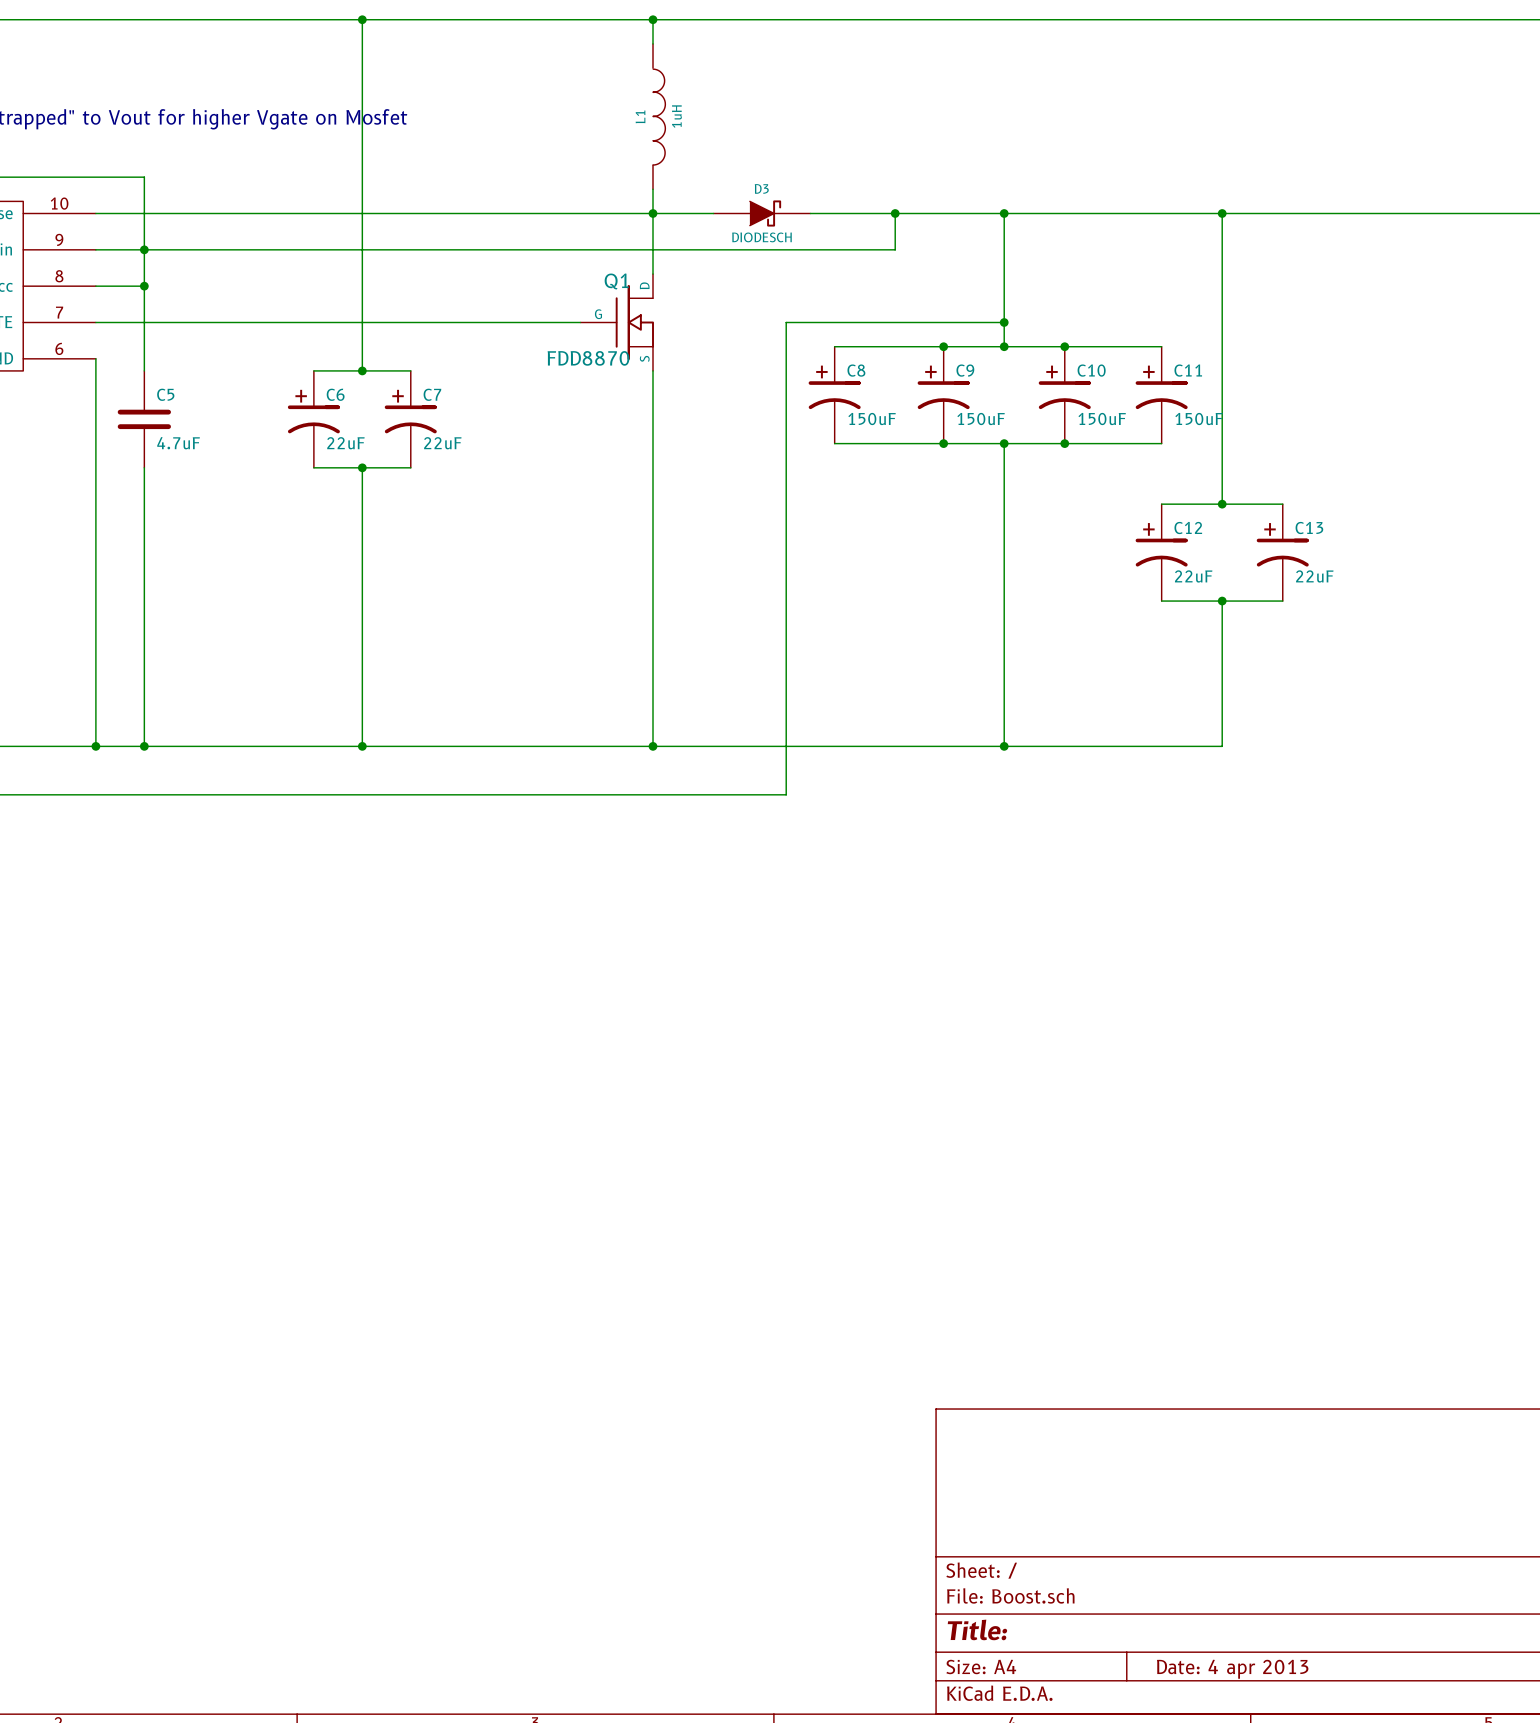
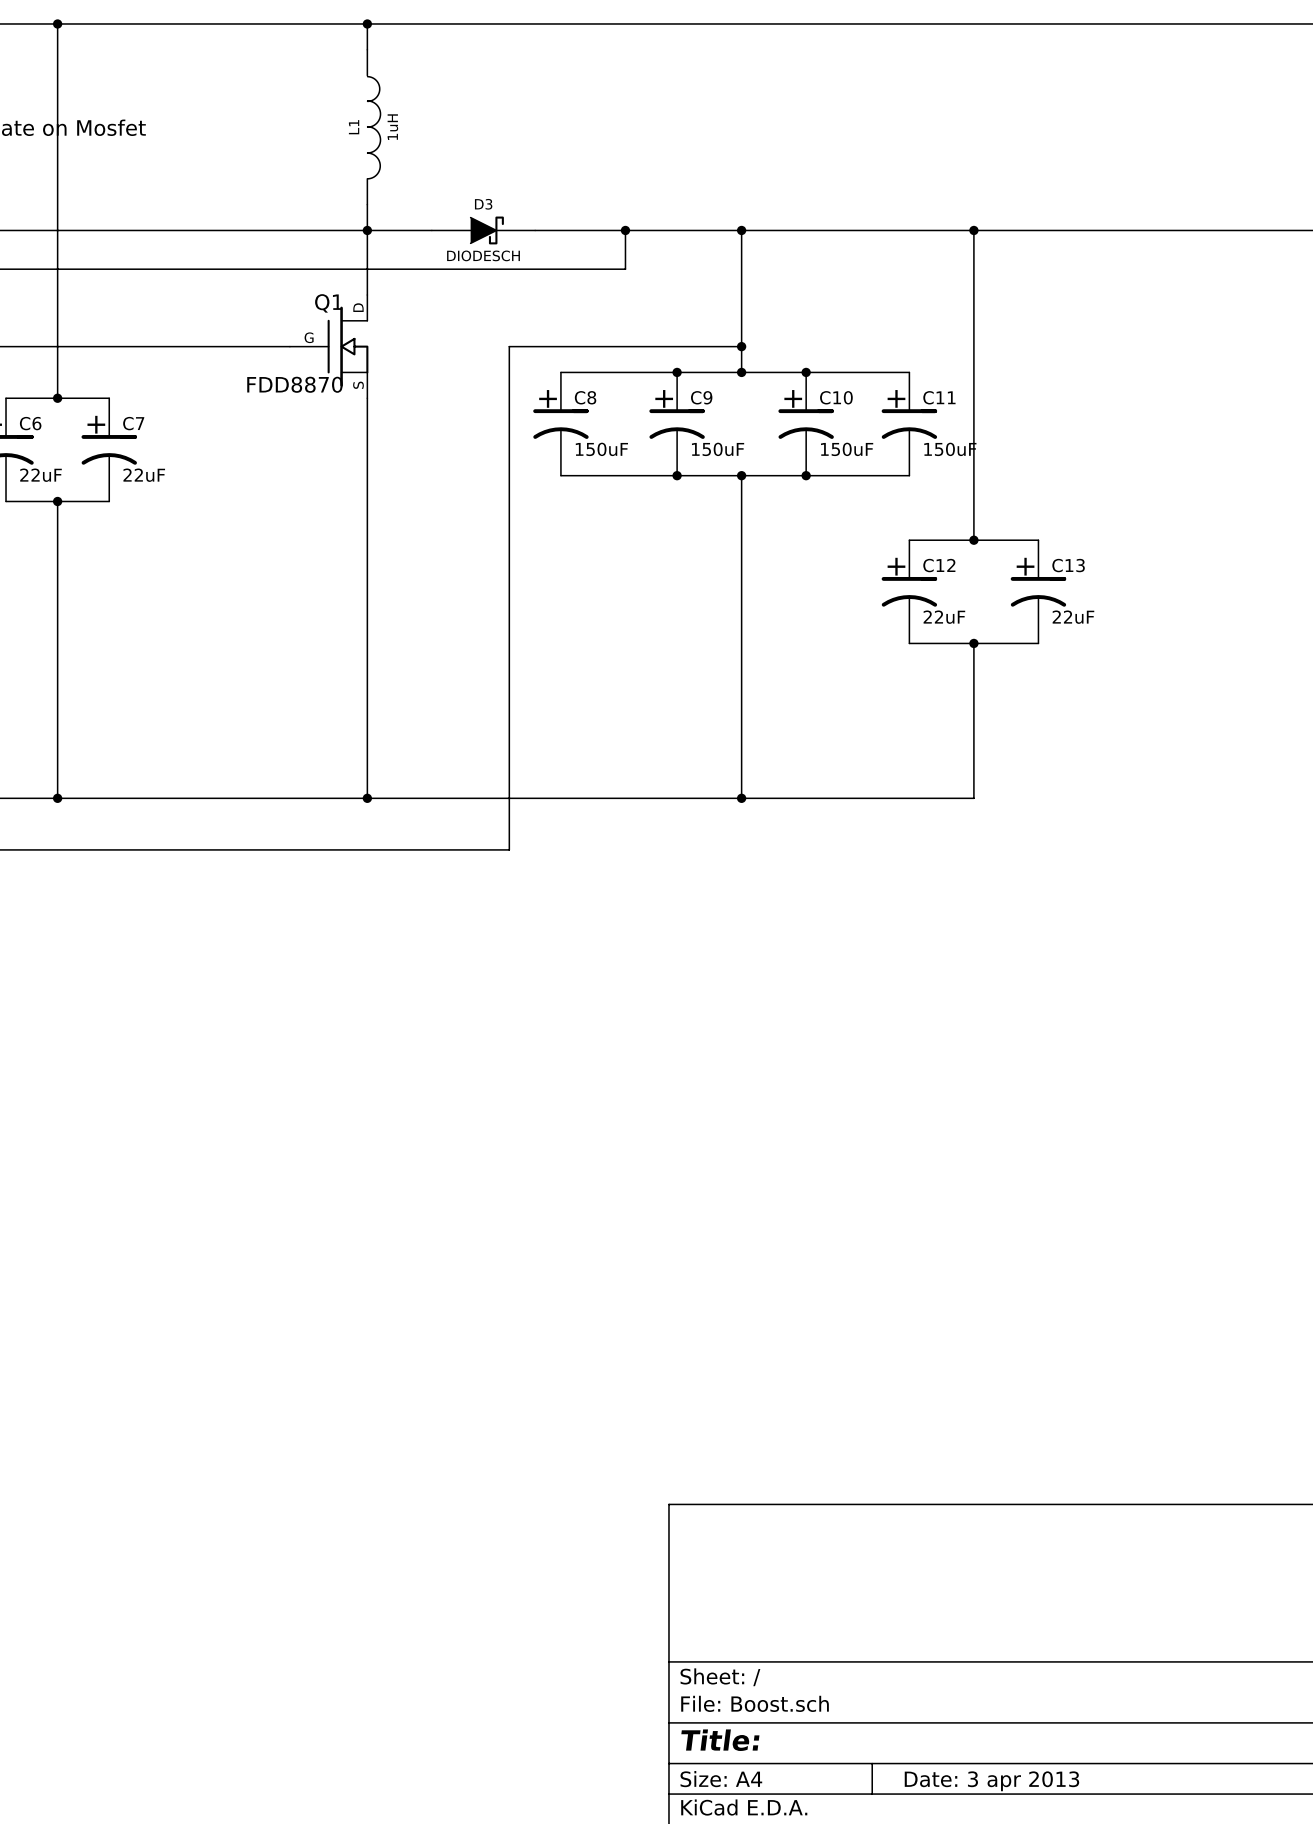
title block: Date: 4 apr 2013 (1232, 1669) -> Date: 3 apr 2013 (991, 1781)

